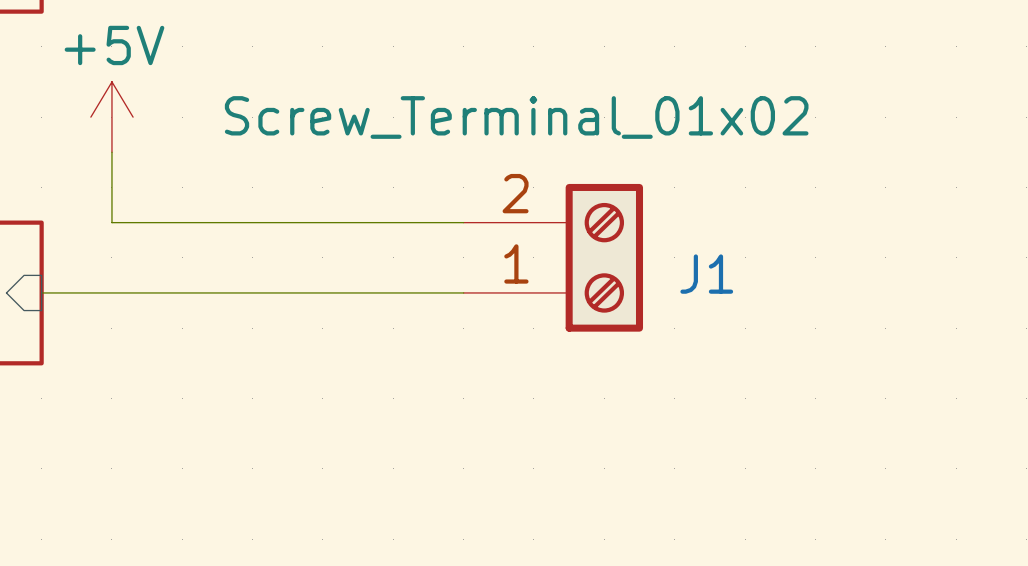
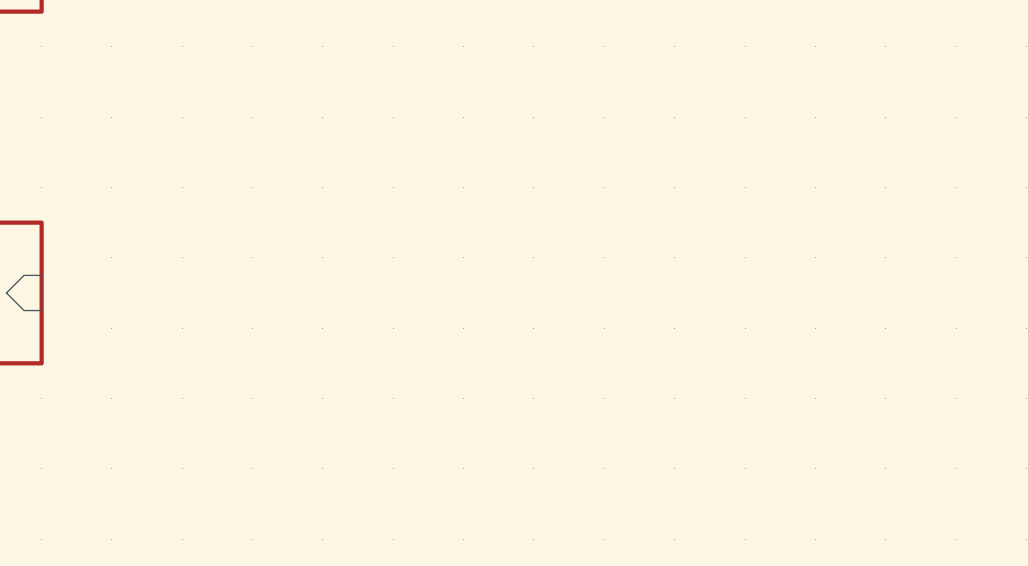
power symbol: +5V (111, 117) -> none
wire: (111, 152) (111, 222) (463, 222) -> none
J1: Screw_Terminal_01x02 (553, 257) -> none
wire: (41, 292) (463, 292) -> none

